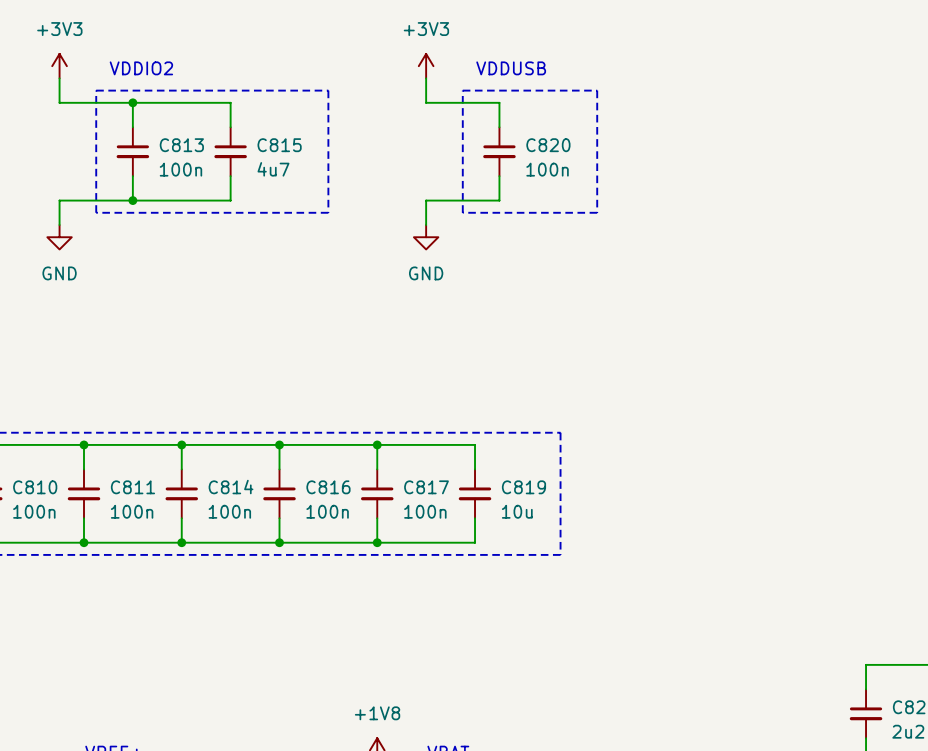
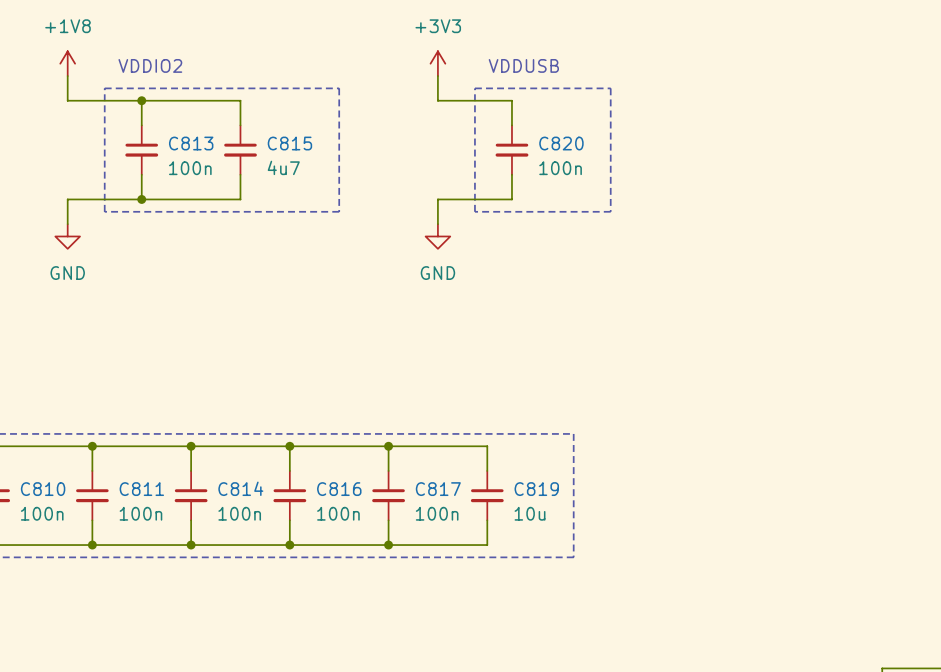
power symbol: +3V3 (59, 66) -> +1V8 (67, 63)

